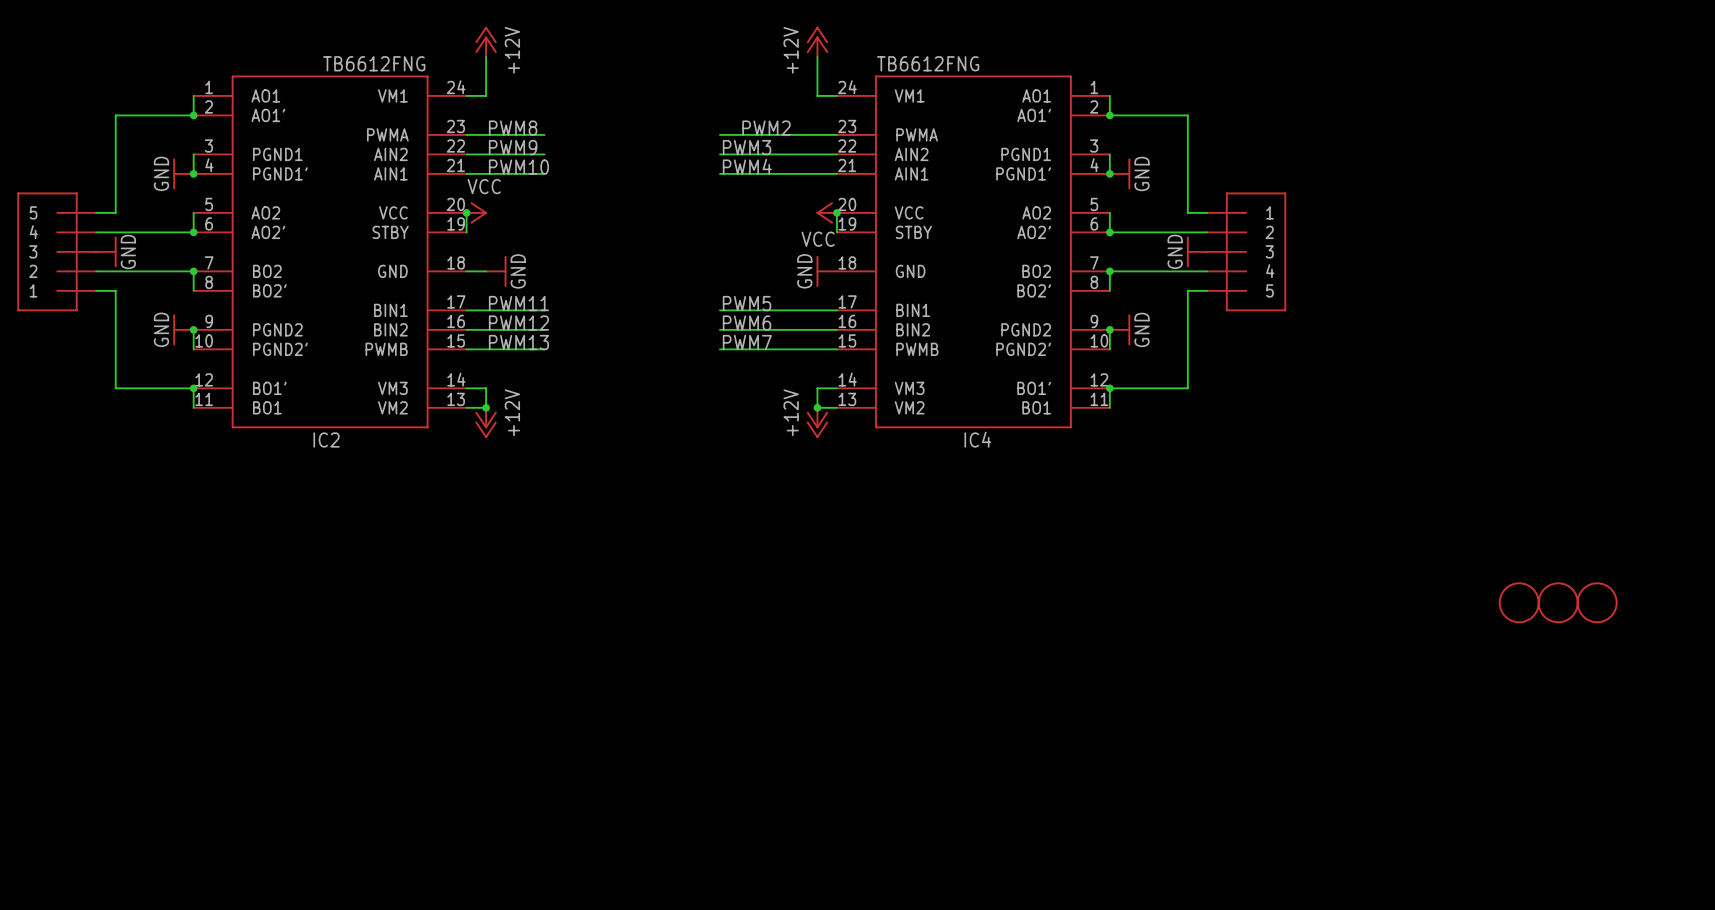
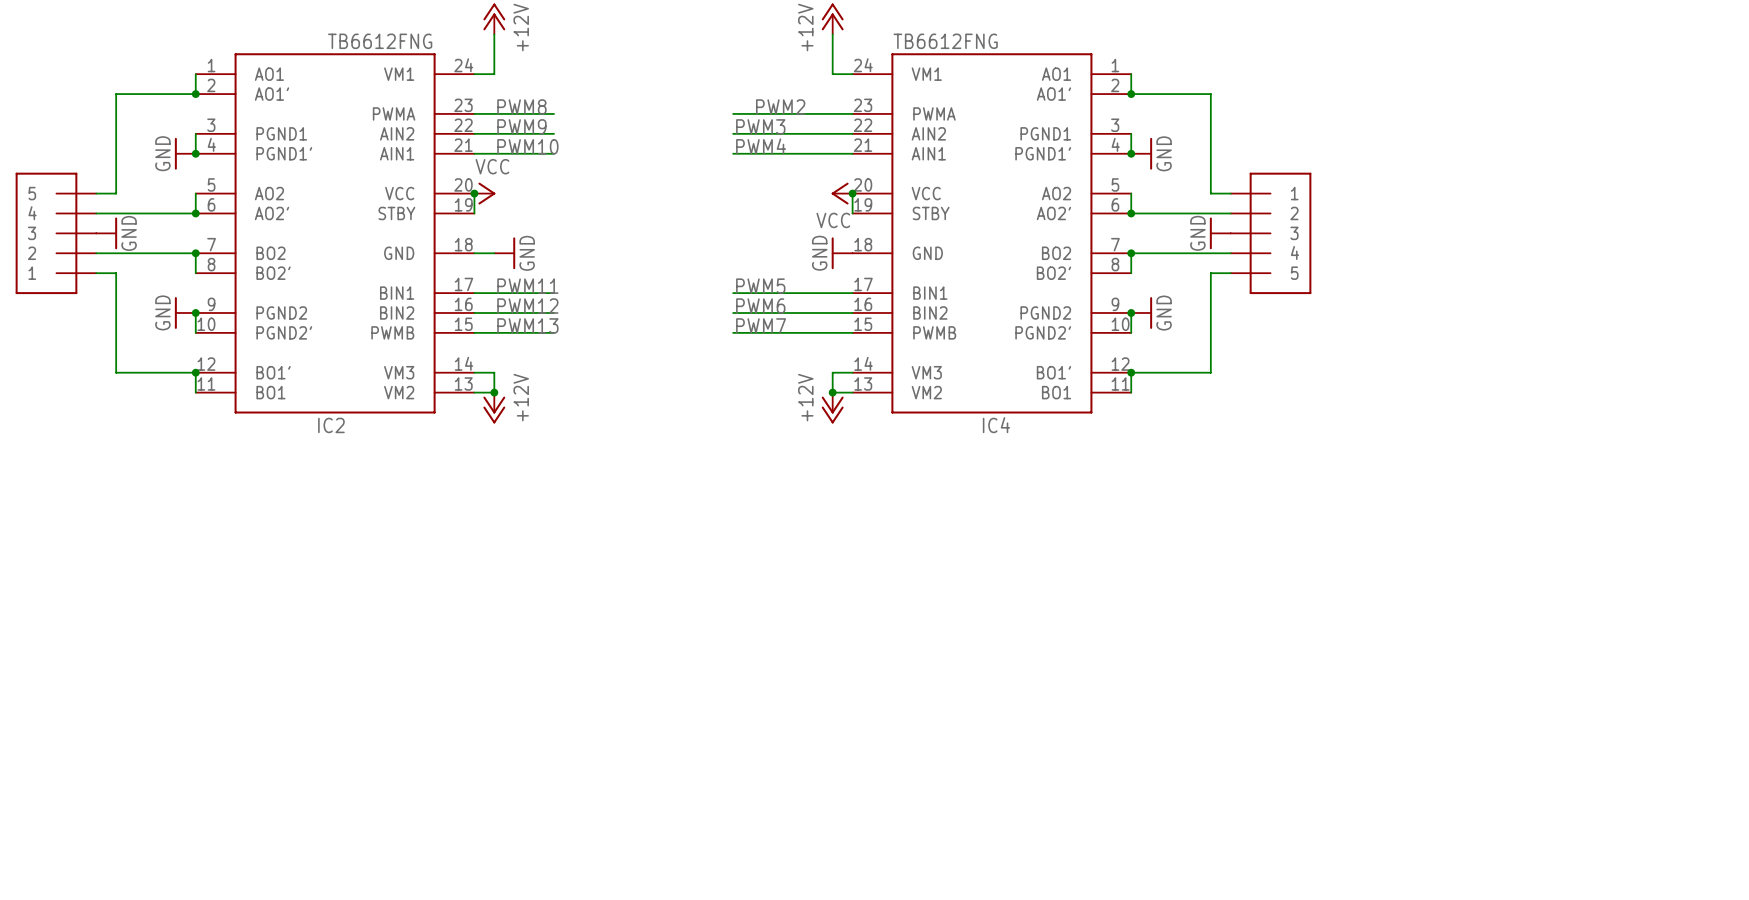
part: (1519, 602) -> none
part: (1558, 602) -> none
part: (1597, 602) -> none

